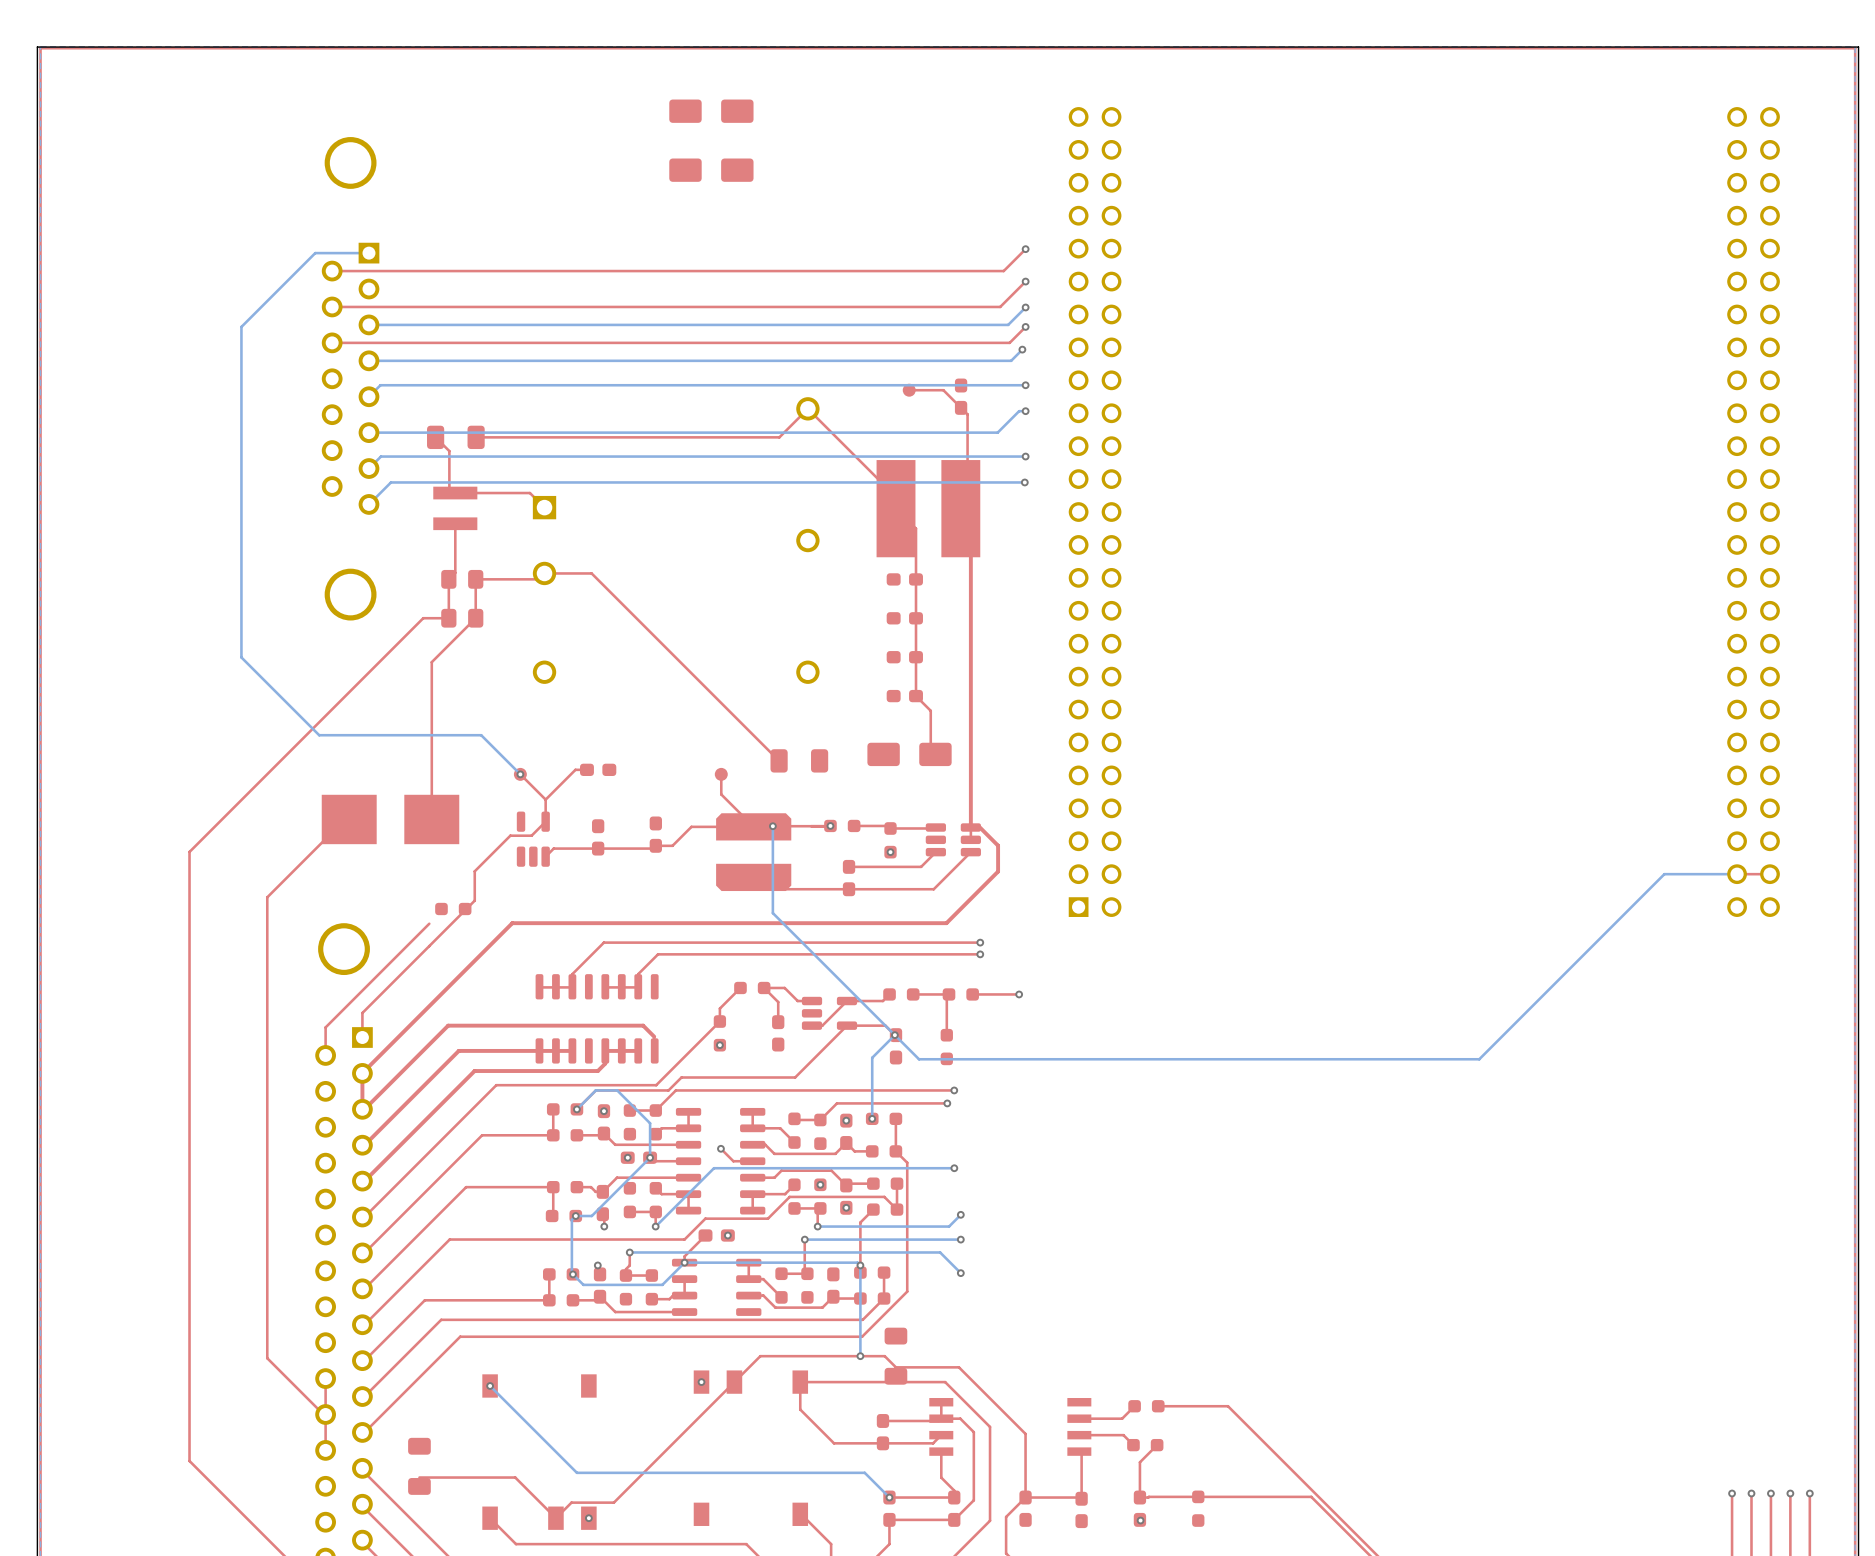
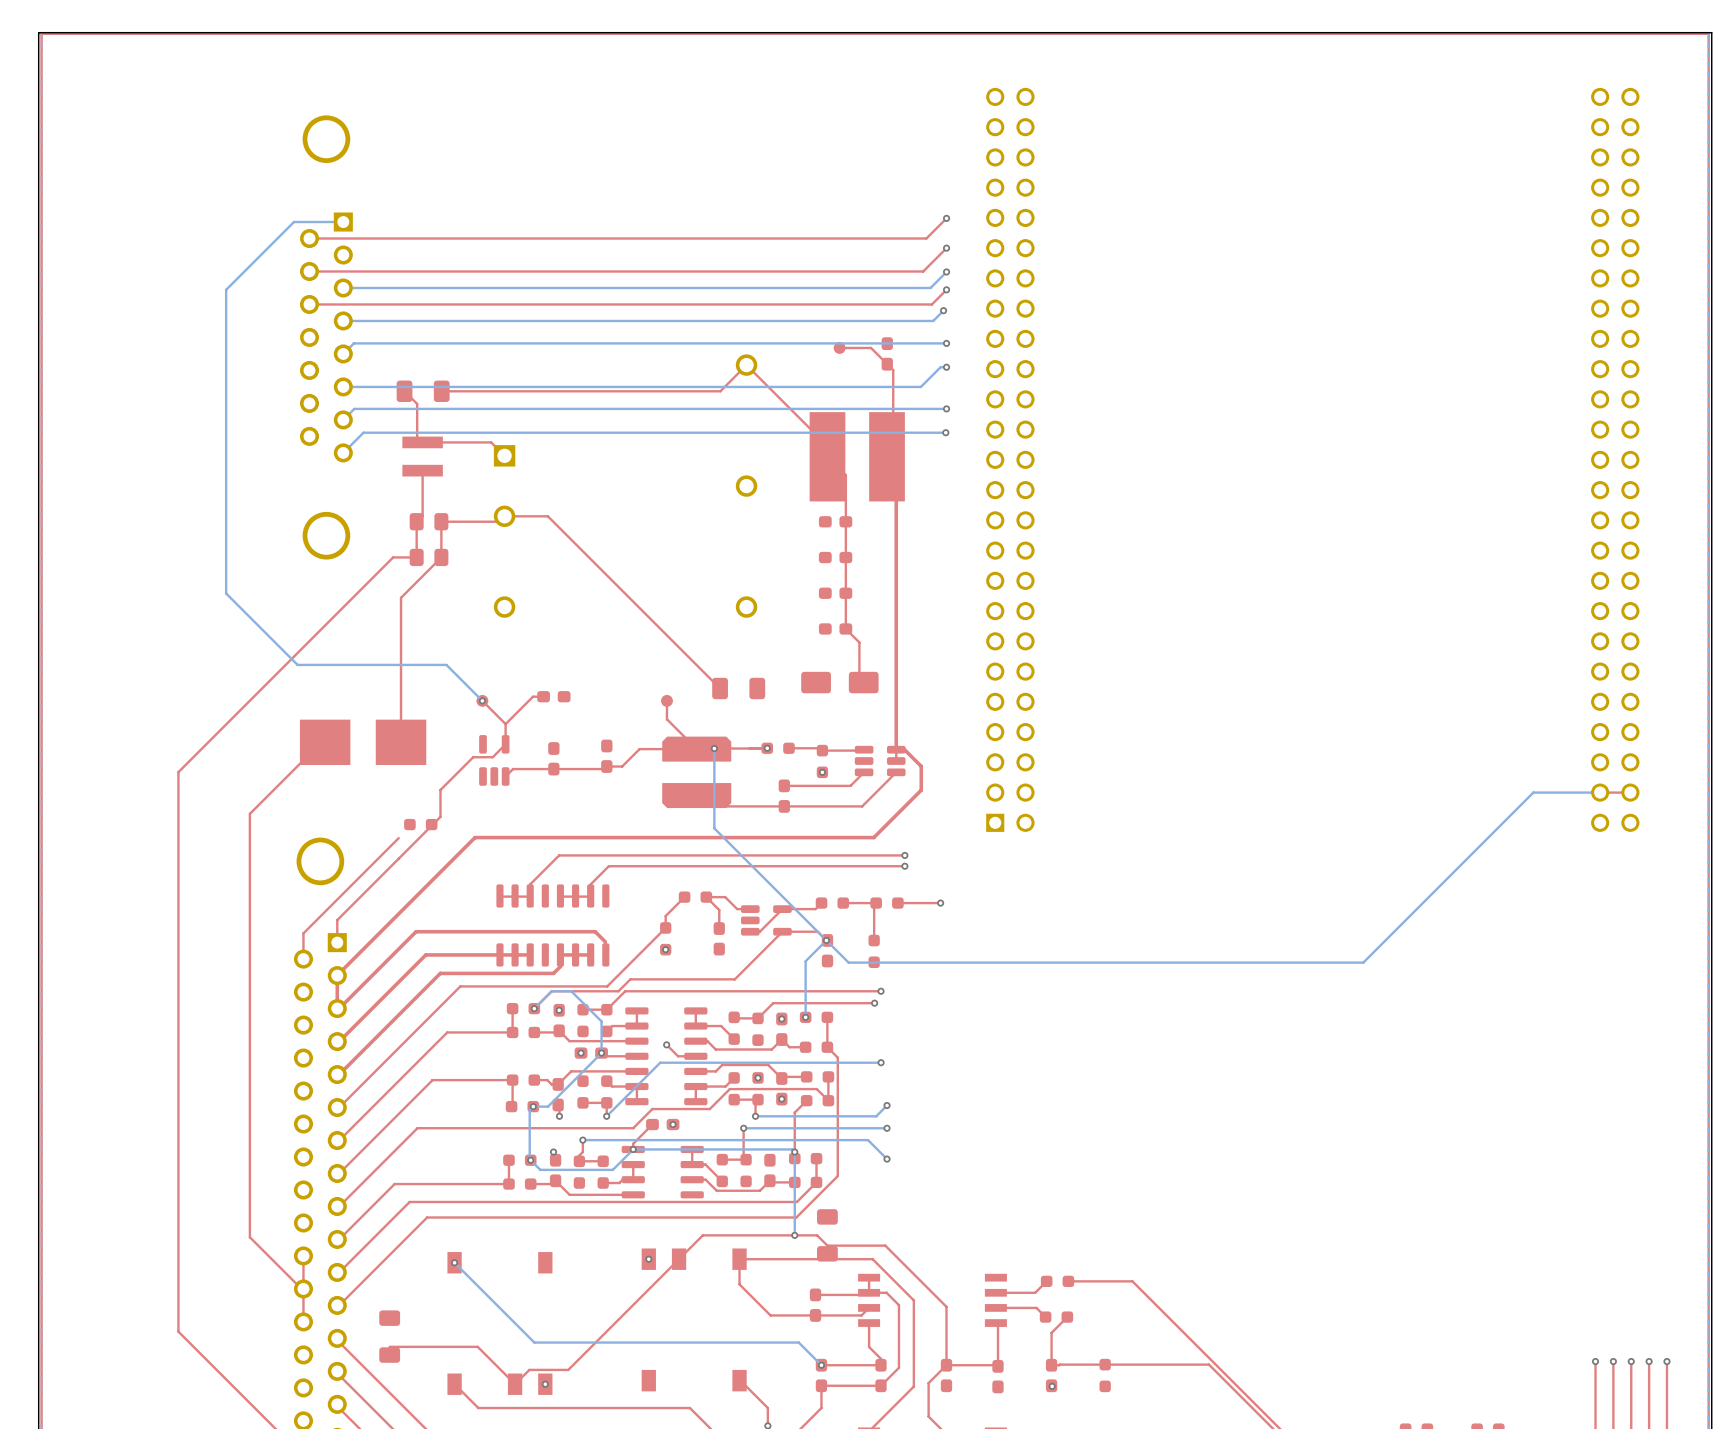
part: (711, 111) -> none
part: (711, 170) -> none

